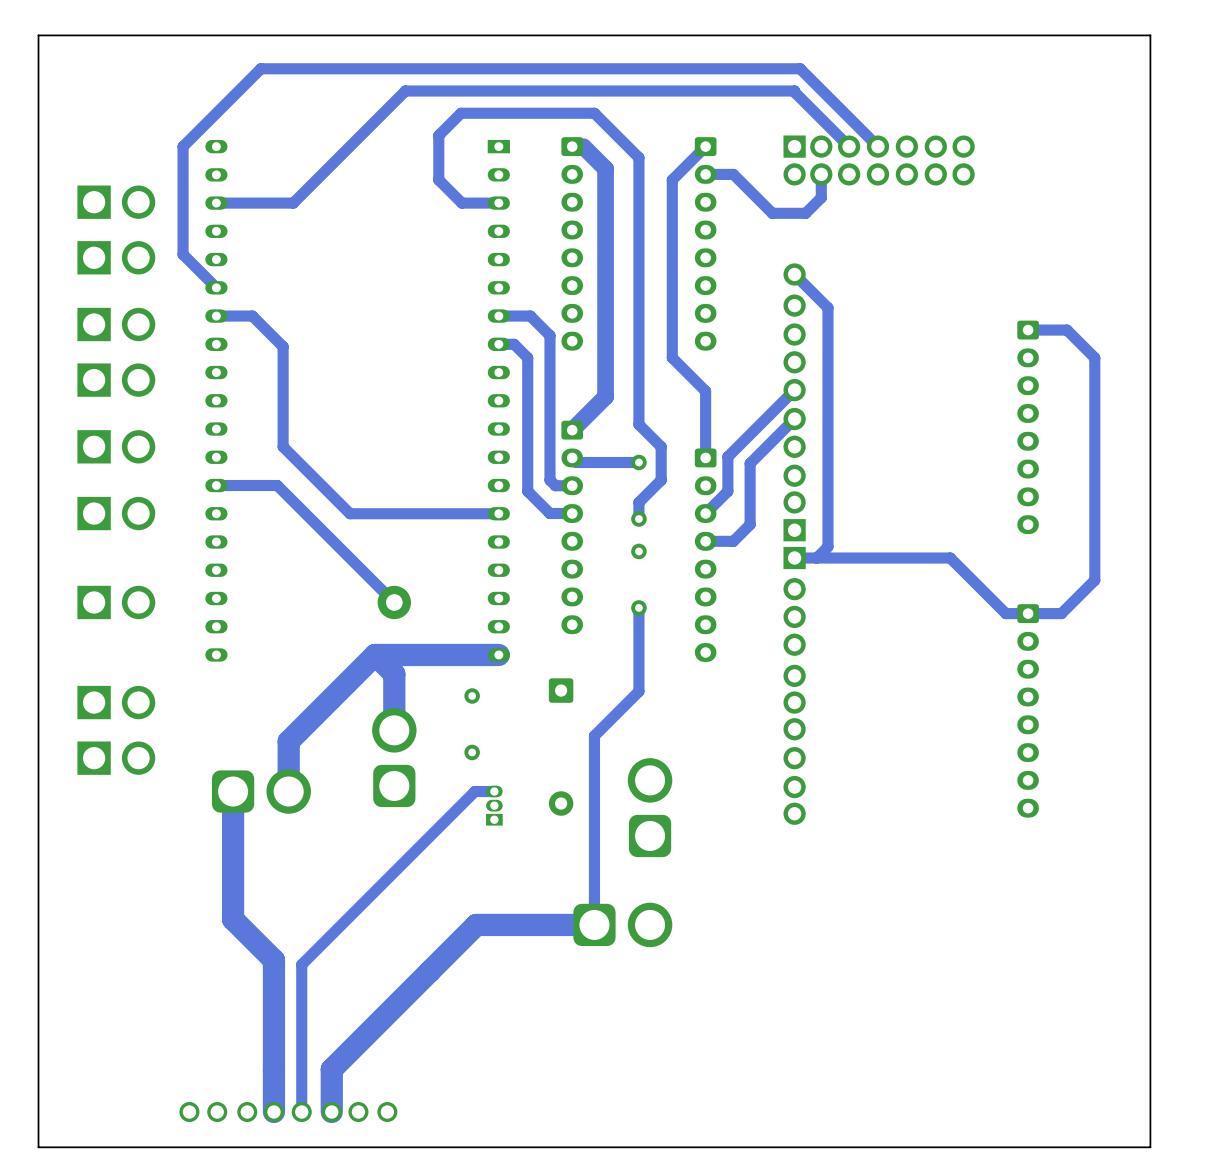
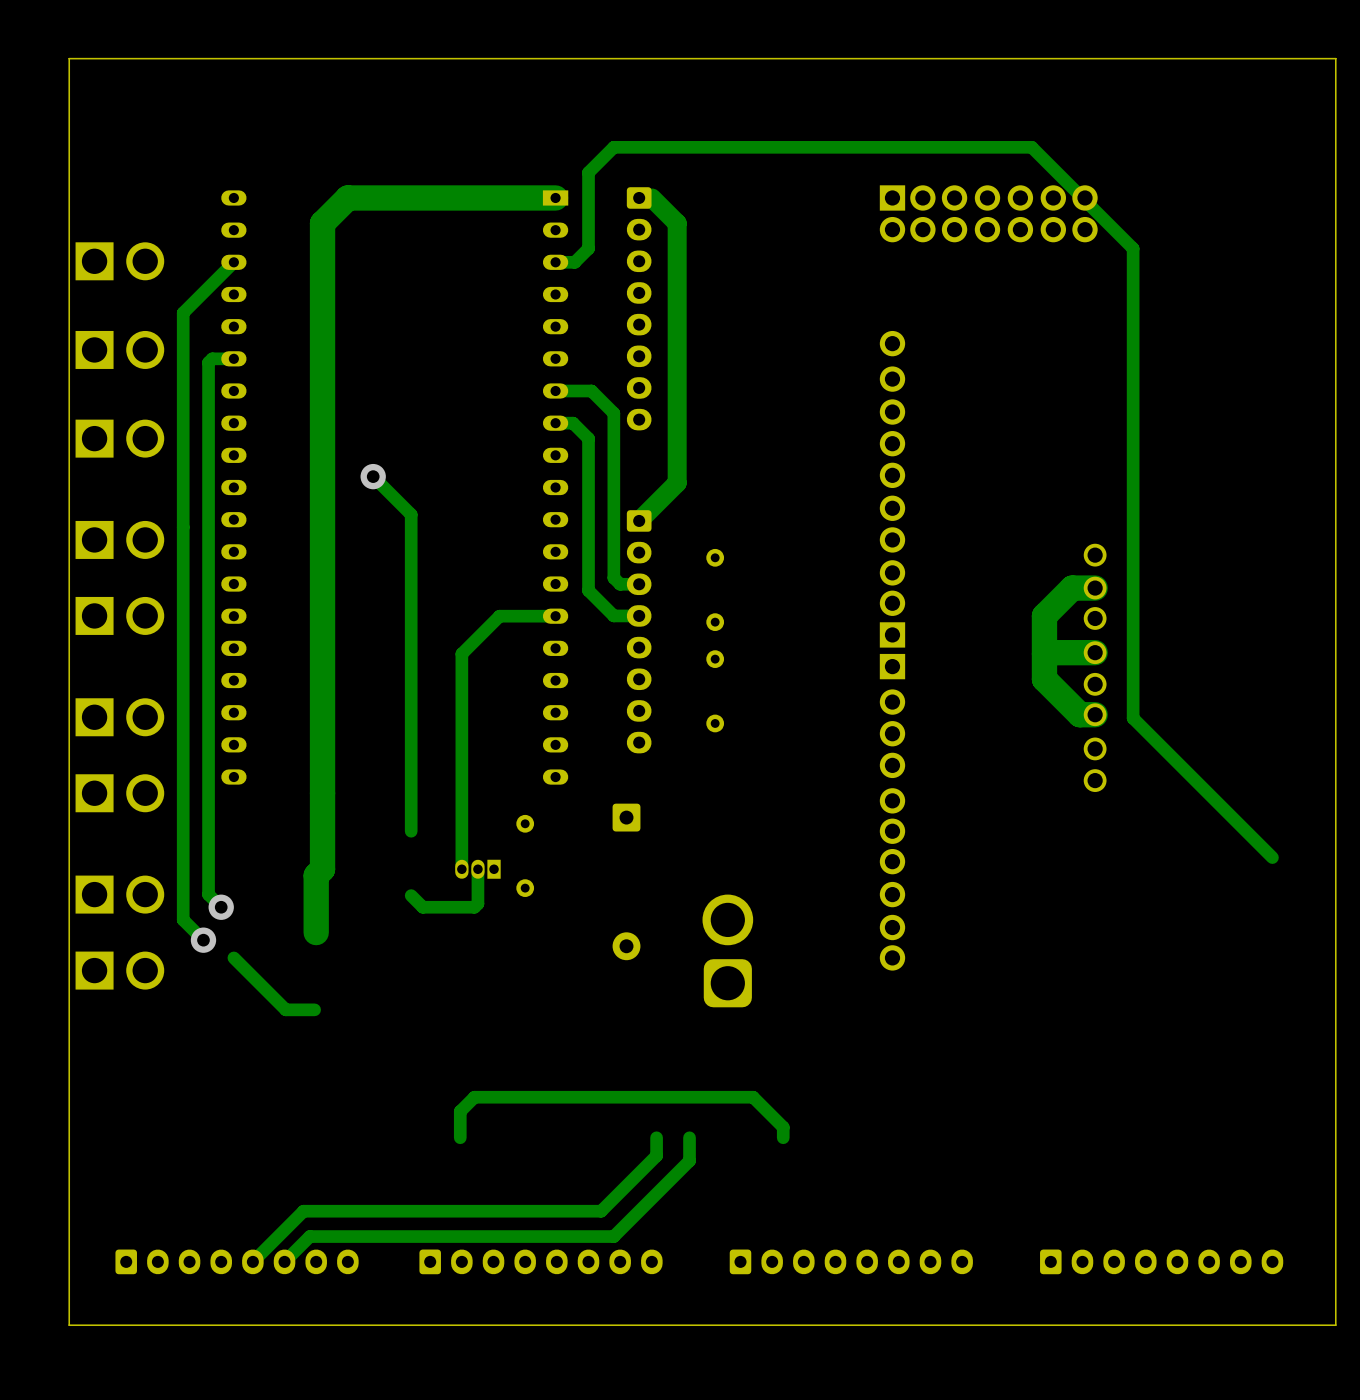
board edge: (1150, 35) (38, 35) (38, 1147) (1150, 1147) (1150, 35) -> (1335, 58) (69, 58) (69, 1325) (1335, 1325) (1335, 58)
track: (705, 146) (672, 179) (672, 357) (705, 391) (705, 457) -> none
track: (849, 146) (794, 91) (405, 91) (293, 203) (216, 203) -> (203, 940) (183, 919) (183, 312) (233, 262)
track: (877, 146) (800, 68) (260, 68) (183, 146) (183, 254) (216, 287) -> (221, 907) (208, 894) (208, 362) (212, 358) (233, 358)
track: (821, 174) (821, 197) (805, 213) (772, 213) (733, 174) (705, 174) -> none
track: (498, 203) (461, 203) (438, 179) (438, 135) (461, 113) (594, 113) (638, 157) (638, 424) (661, 446) (661, 480) (638, 502) (638, 518) -> (555, 262) (574, 262) (588, 248) (588, 172) (613, 147) (1031, 147) (1133, 248) (1133, 718) (1272, 857)
part: (705, 243) -> none
part: (116, 257) -> none
track: (794, 274) (827, 307) (827, 546) (816, 558) -> none
part: none -> (119, 349)
track: (216, 316) (252, 316) (283, 346) (283, 446) (350, 513) (449, 513) -> (461, 869) (461, 653) (499, 616)
part: (116, 324) -> none
track: (1028, 330) (1067, 330) (1094, 357) (1094, 580) (1061, 613) (1005, 613) (950, 558) (794, 558) -> none
part: none -> (119, 438)
part: (116, 380) -> none
track: (794, 390) (727, 456) (727, 491) (705, 513) -> none
track: none -> (373, 476) (411, 514) (411, 831)
via: none -> (373, 476)
track: (794, 419) (750, 463) (750, 524) (733, 541) (705, 541) -> none
part: (1028, 427) -> none
track: (572, 457) (576, 462) (638, 462) -> none
track: (216, 485) (277, 485) (394, 602) -> none
track: none -> (1095, 588) (1072, 588) (1044, 615) (1044, 679) (1079, 714) (1095, 714)
track: none -> (1095, 652) (1044, 653)
part: (705, 555) -> none
part: none -> (1095, 667)
via: (394, 602) -> none
track: (638, 607) (638, 691) (594, 735) (594, 924) (476, 924) (331, 1069) (331, 1112) -> none
track: (375, 654) (294, 735) -> (555, 197) (347, 197) (322, 223) (322, 869)
track: (375, 654) (394, 674) (394, 730) -> none
track: (498, 654) (375, 654) -> none
part position: (116, 702) -> (119, 793)
part: (1028, 710) -> none
track: none -> (477, 869) (477, 903) (474, 907) (422, 907) (411, 895)
part: (394, 757) -> none
via: none -> (221, 907)
track: (233, 791) (233, 919) (273, 960) (273, 1112) -> none
part: (261, 791) -> none
track: (494, 791) (474, 791) (301, 964) (301, 1112) -> none
via: none -> (203, 940)
part rotation: 0° (494, 805) -> 90° counterclockwise (477, 869)
part position: (494, 805) -> (477, 869)
track: none -> (233, 957) (285, 1009) (314, 1009)
part: none -> (119, 970)
part: (622, 924) -> none
track: none -> (656, 1137) (656, 1155) (601, 1211) (303, 1211) (252, 1261)
track: none -> (689, 1137) (689, 1160) (613, 1236) (309, 1236) (284, 1261)
track: none -> (783, 1137) (783, 1127) (753, 1097) (474, 1097) (460, 1111) (460, 1137)
part: none -> (237, 1261)
part: none -> (541, 1261)
part: none -> (851, 1261)
part: none -> (1161, 1261)
part: (288, 1112) -> none

